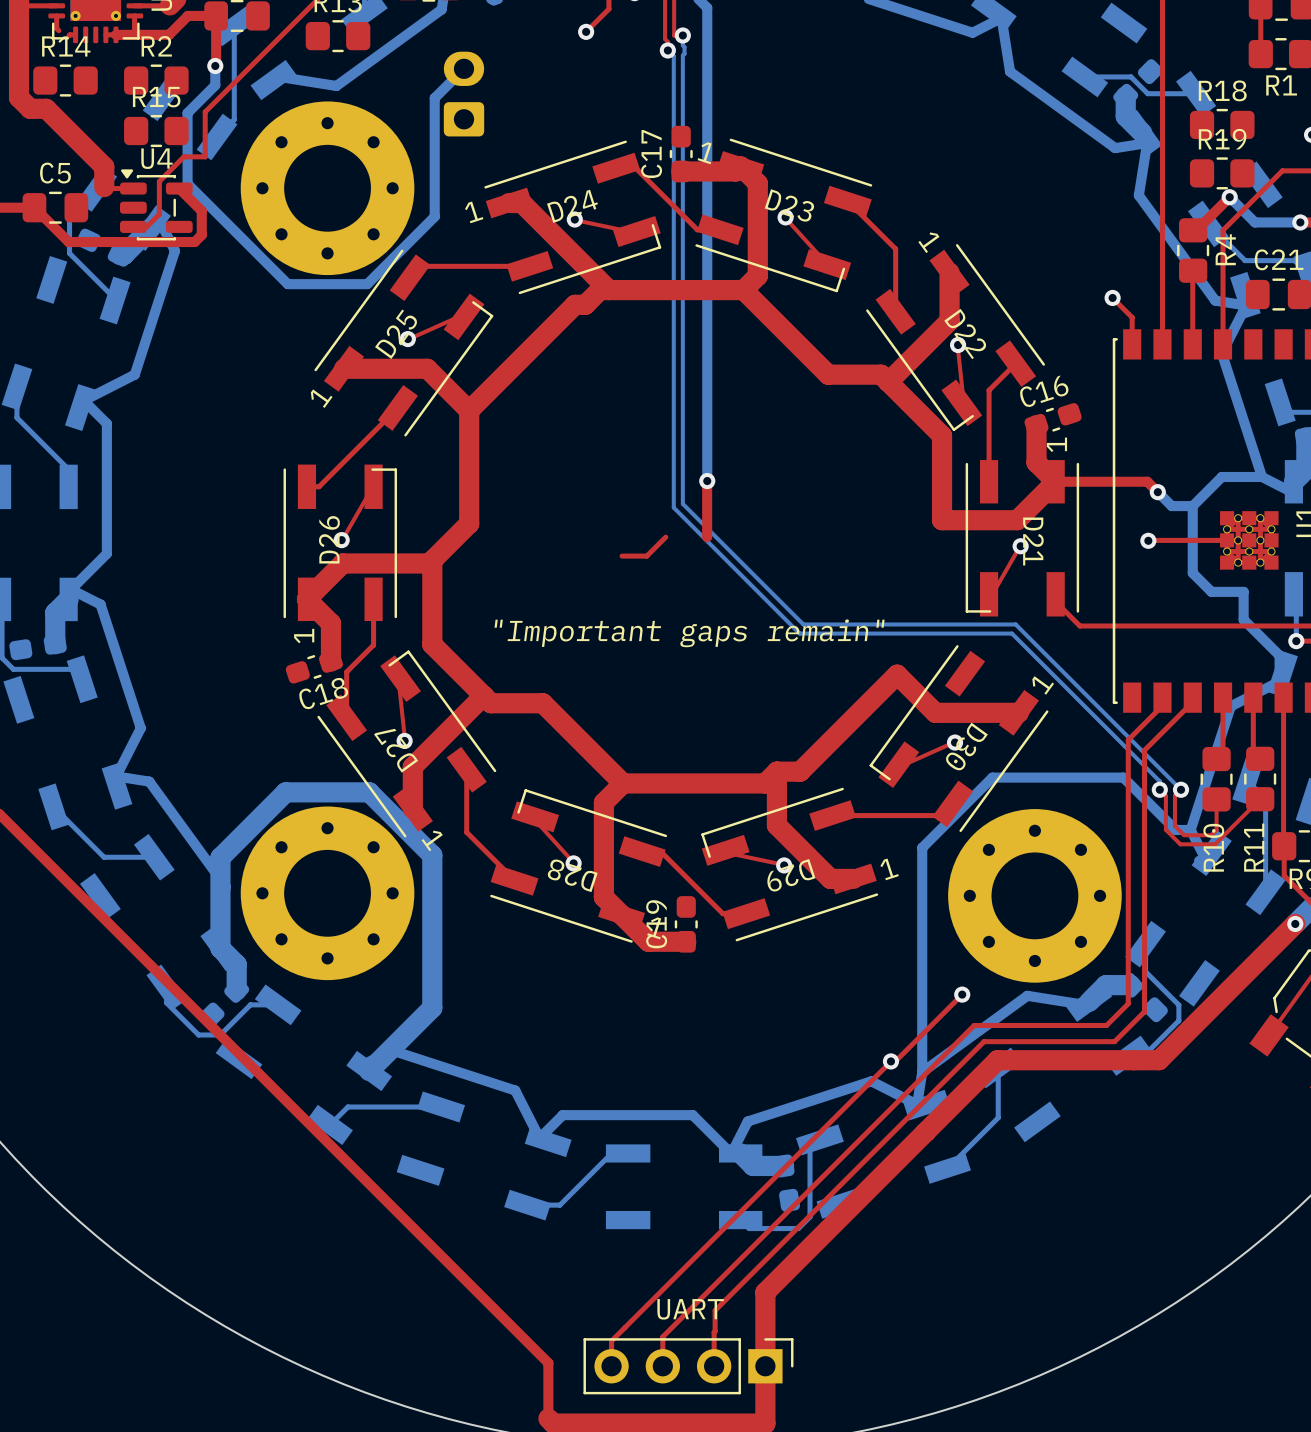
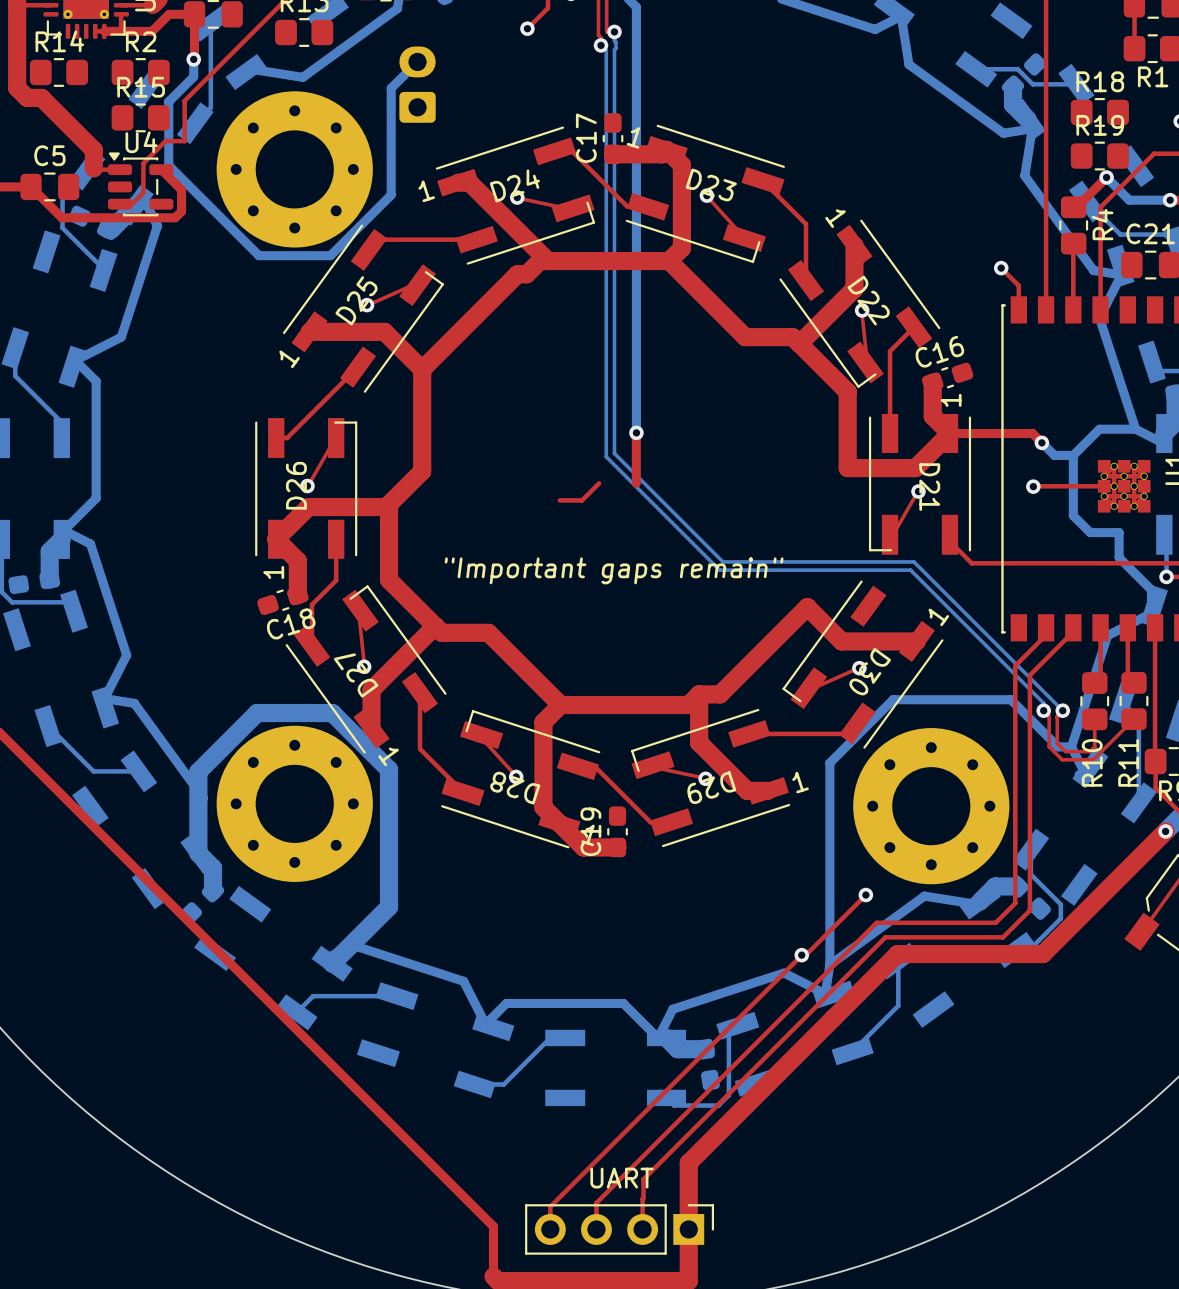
top track: (56, 15) (56, 28) (58, 30) -> none
top track: (75, 34) (68, 35) -> none
bottom track: (166, 987) (166, 1002) (198, 1034) (220, 1034) (250, 1004) (278, 1004) -> none

